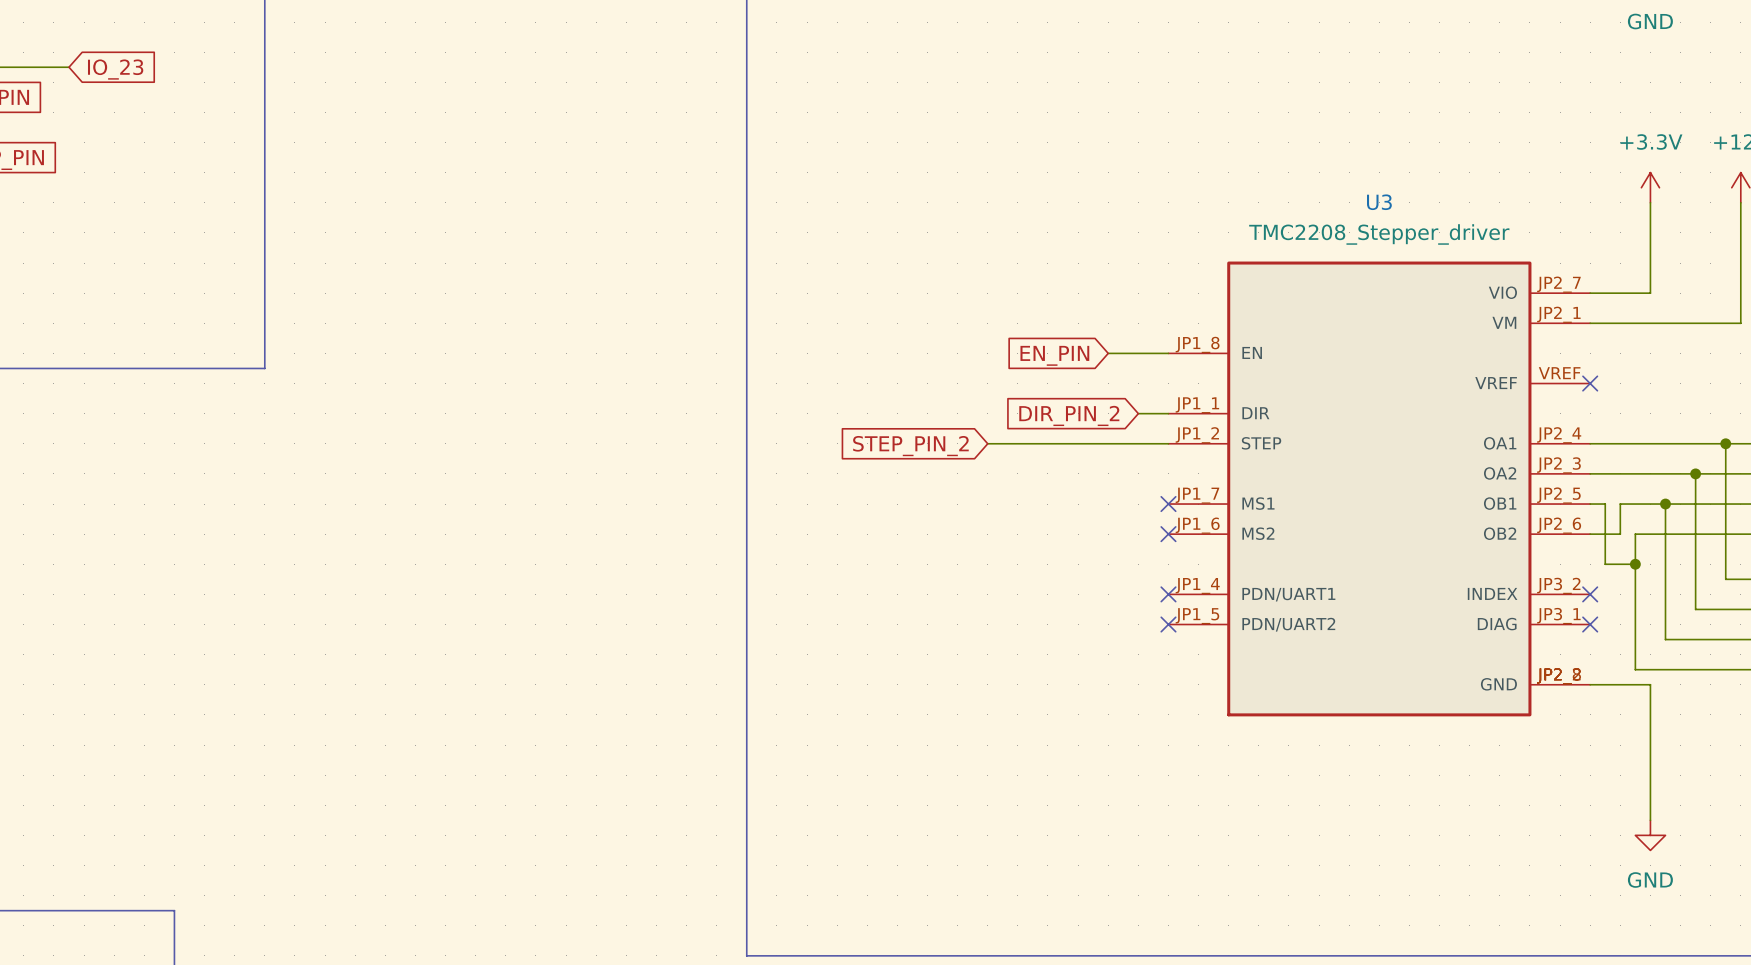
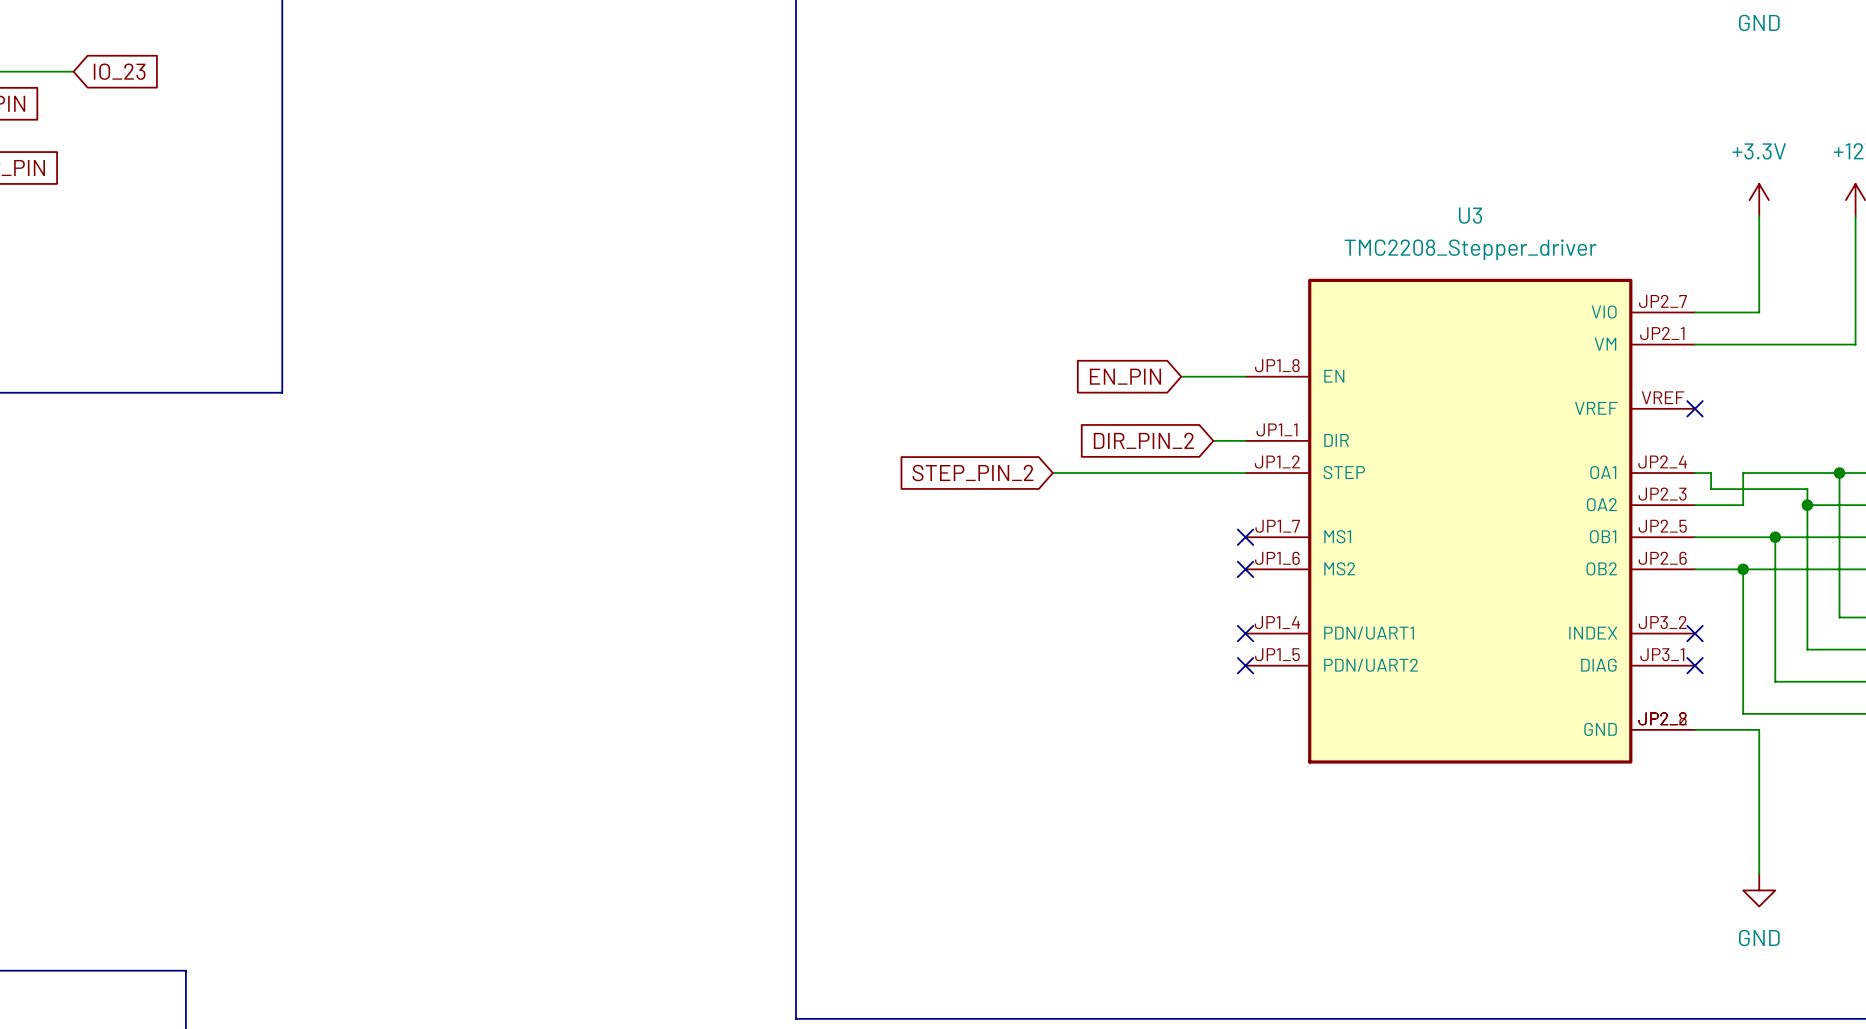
wire: (1605, 443) (1635, 443) -> (1743, 505) (1743, 473)
wire: (1635, 473) (1695, 473) -> (1711, 473) (1711, 489) (1807, 489) (1807, 505)
wire: (1605, 504) (1605, 564) (1635, 564) -> none
wire: (1620, 504) (1620, 534) -> (1727, 537) (1711, 537)
wire: none -> (1727, 569) (1743, 569)
junction position: (1635, 564) -> (1743, 569)

